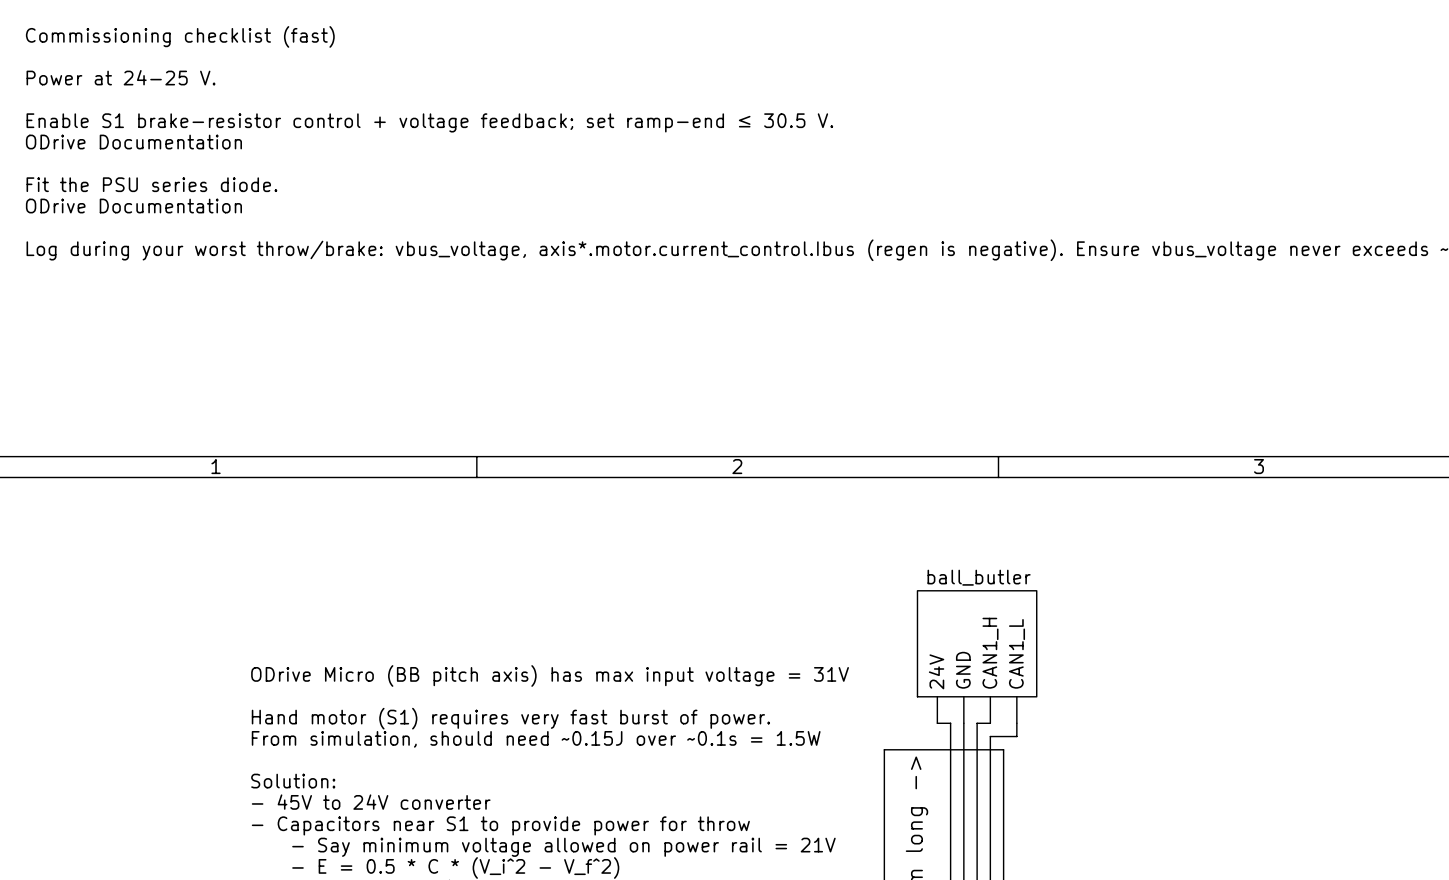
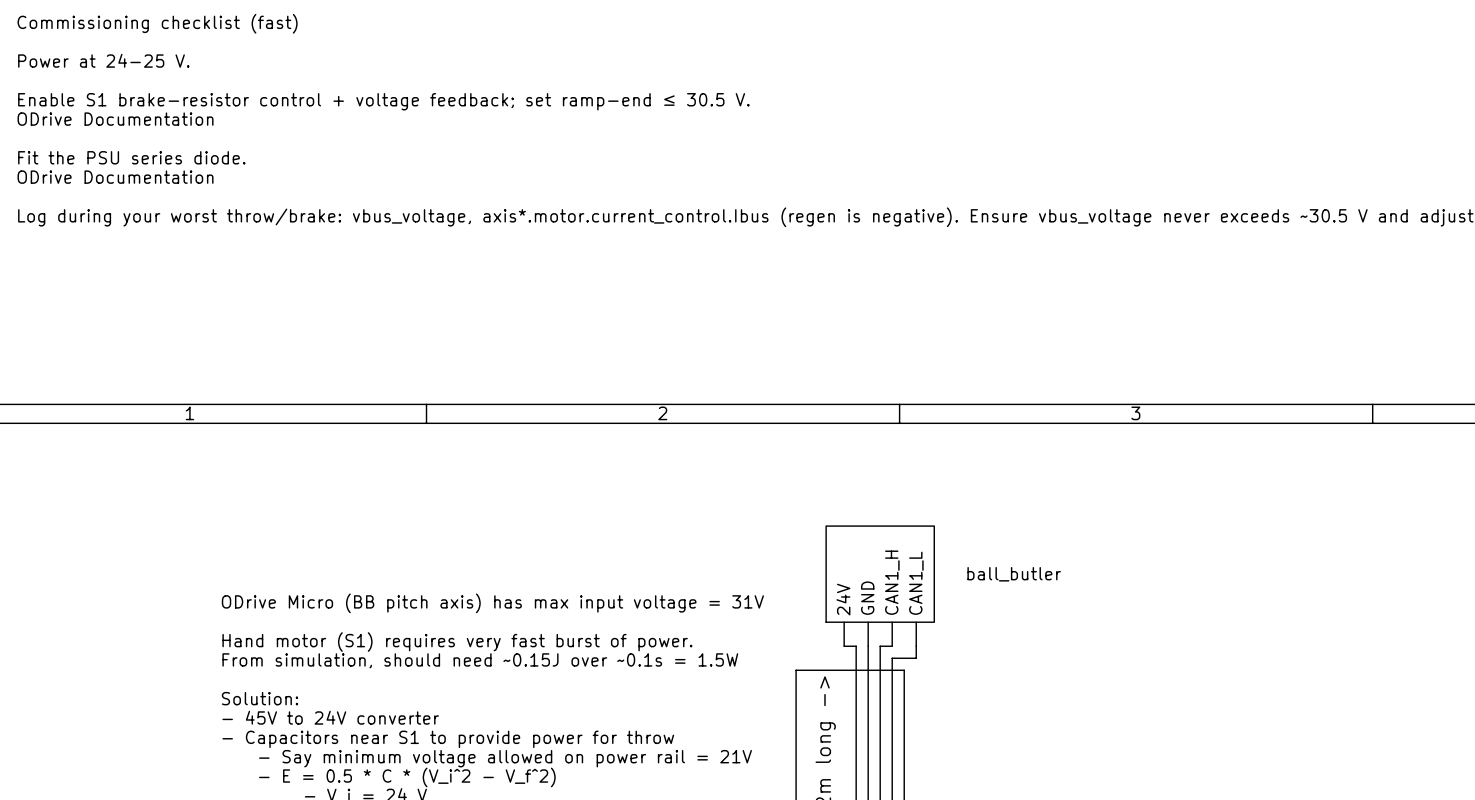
part value position: ball_butler (979, 577) -> ball_butler (1014, 574)

